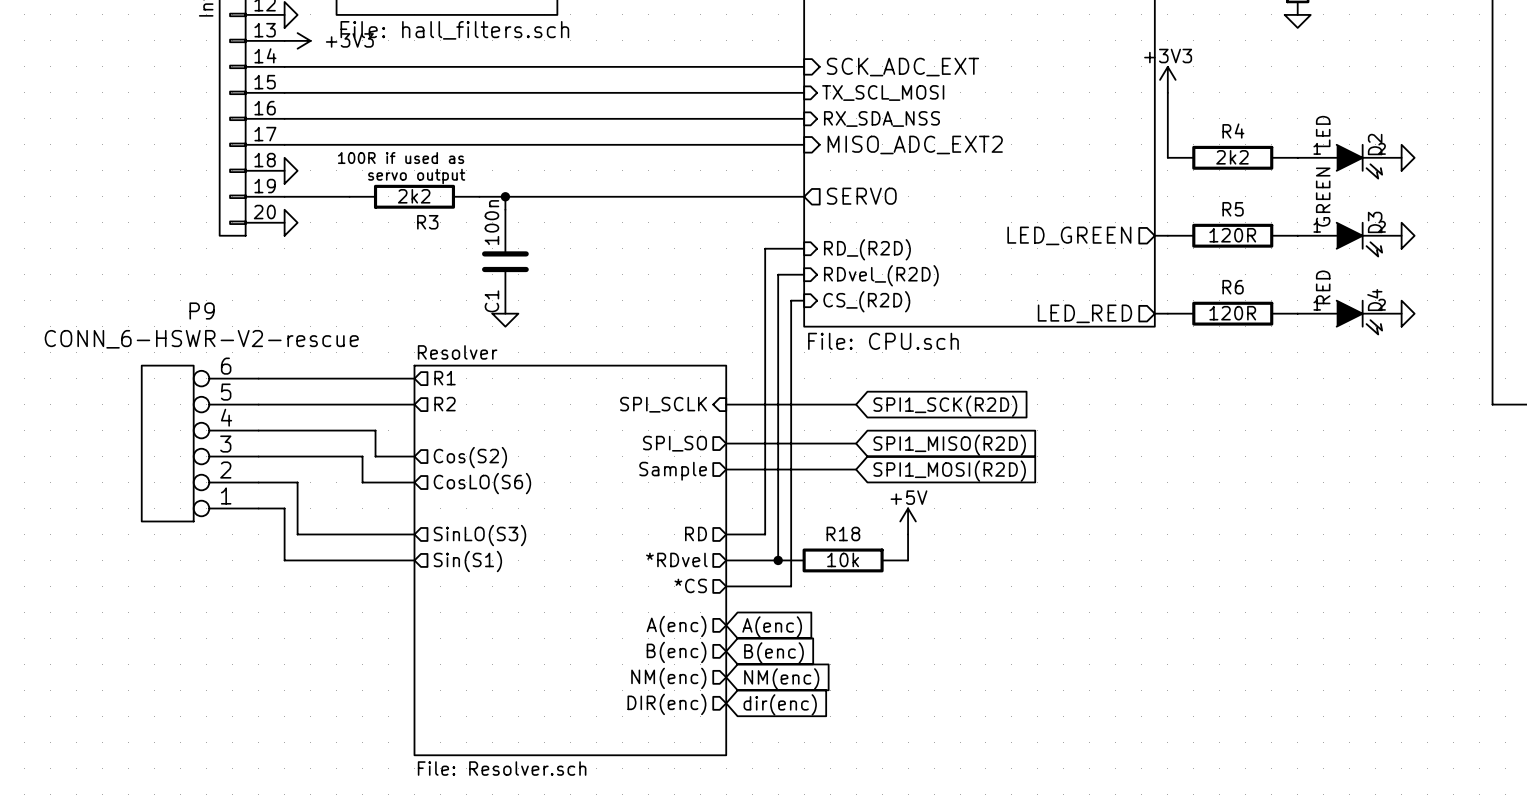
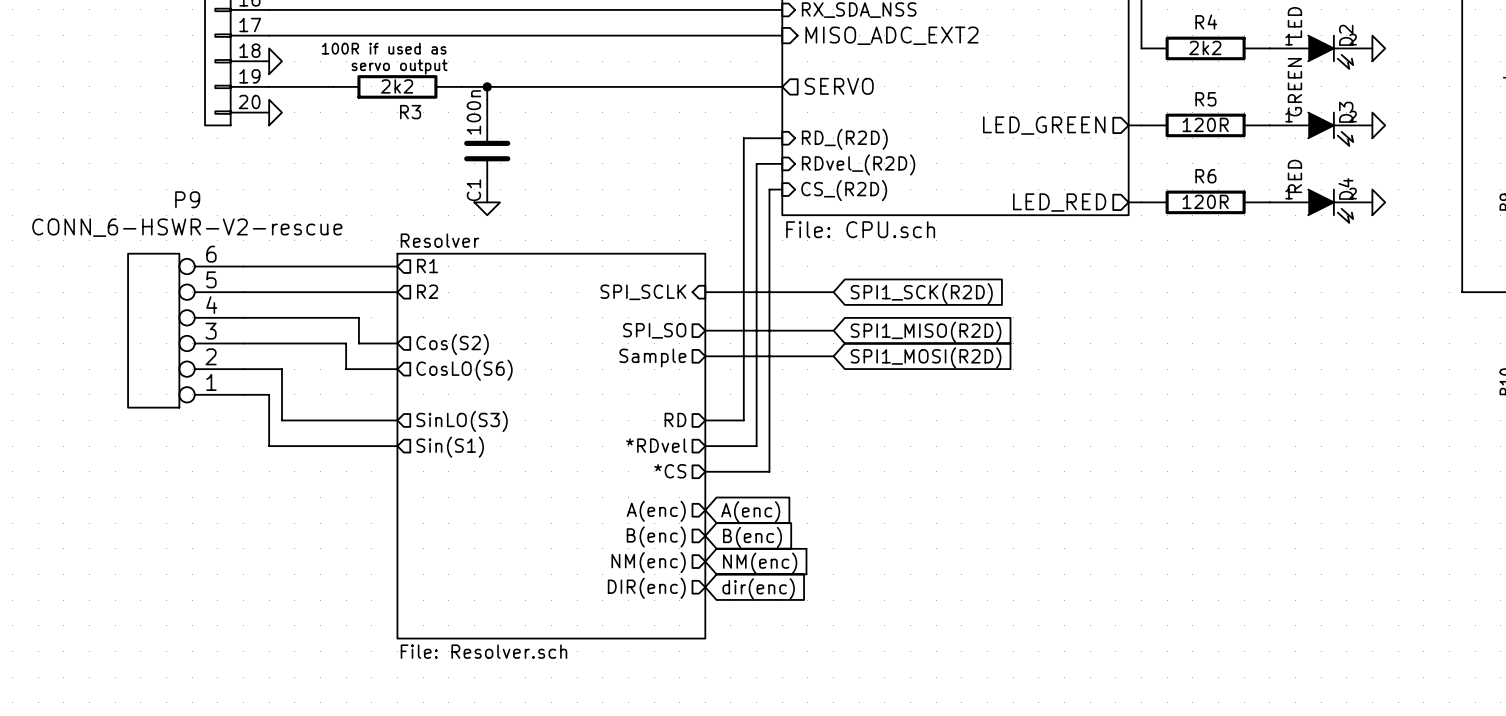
power symbol: +5V (908, 521) -> none
wire: (908, 534) (908, 560) -> none
junction: (778, 560) -> none
R18: 10k (843, 560) -> none

